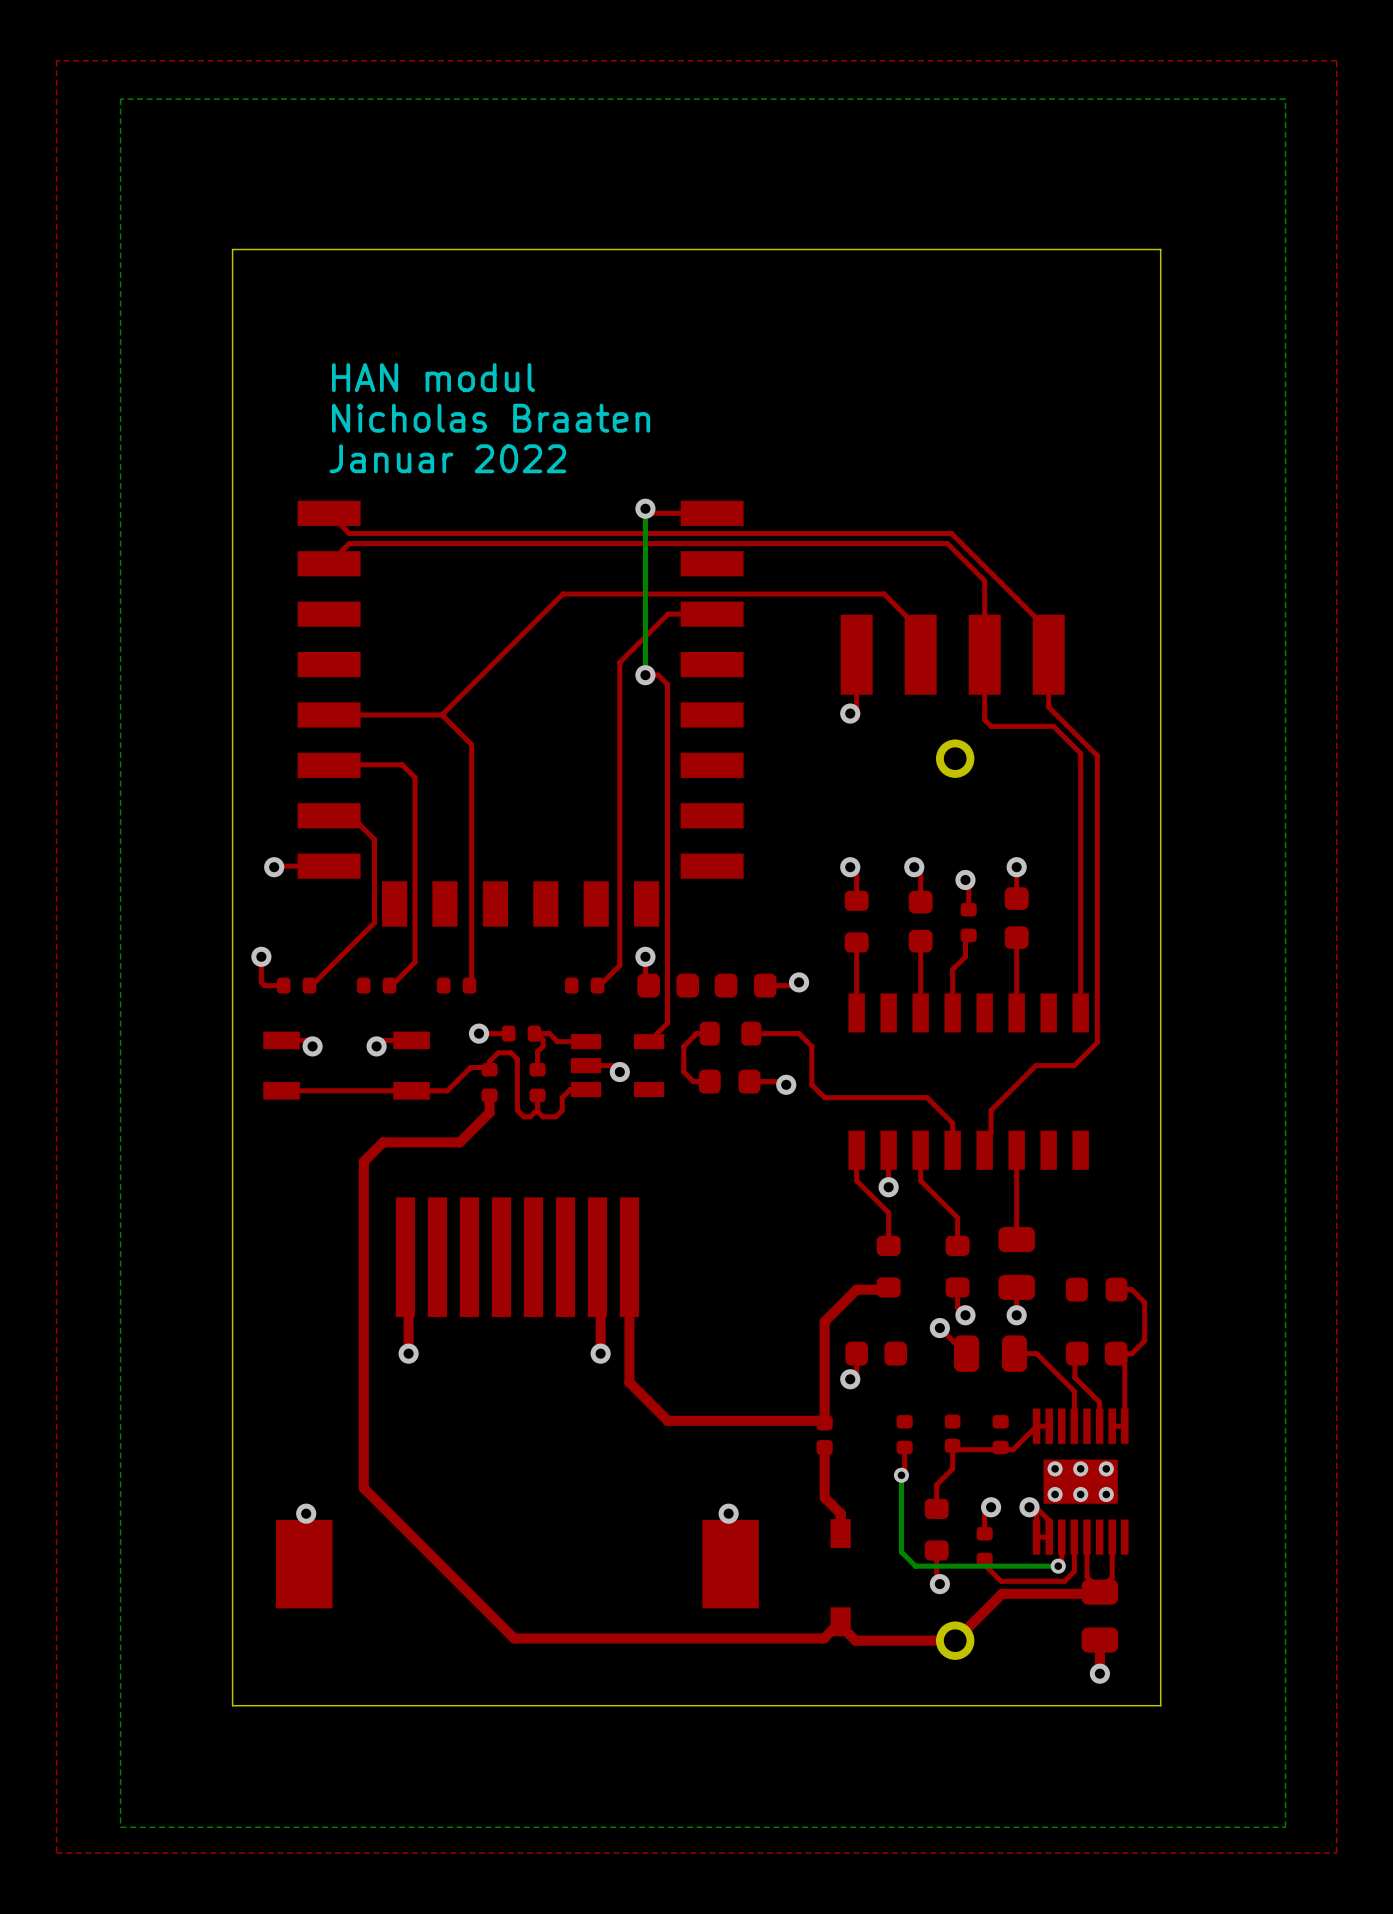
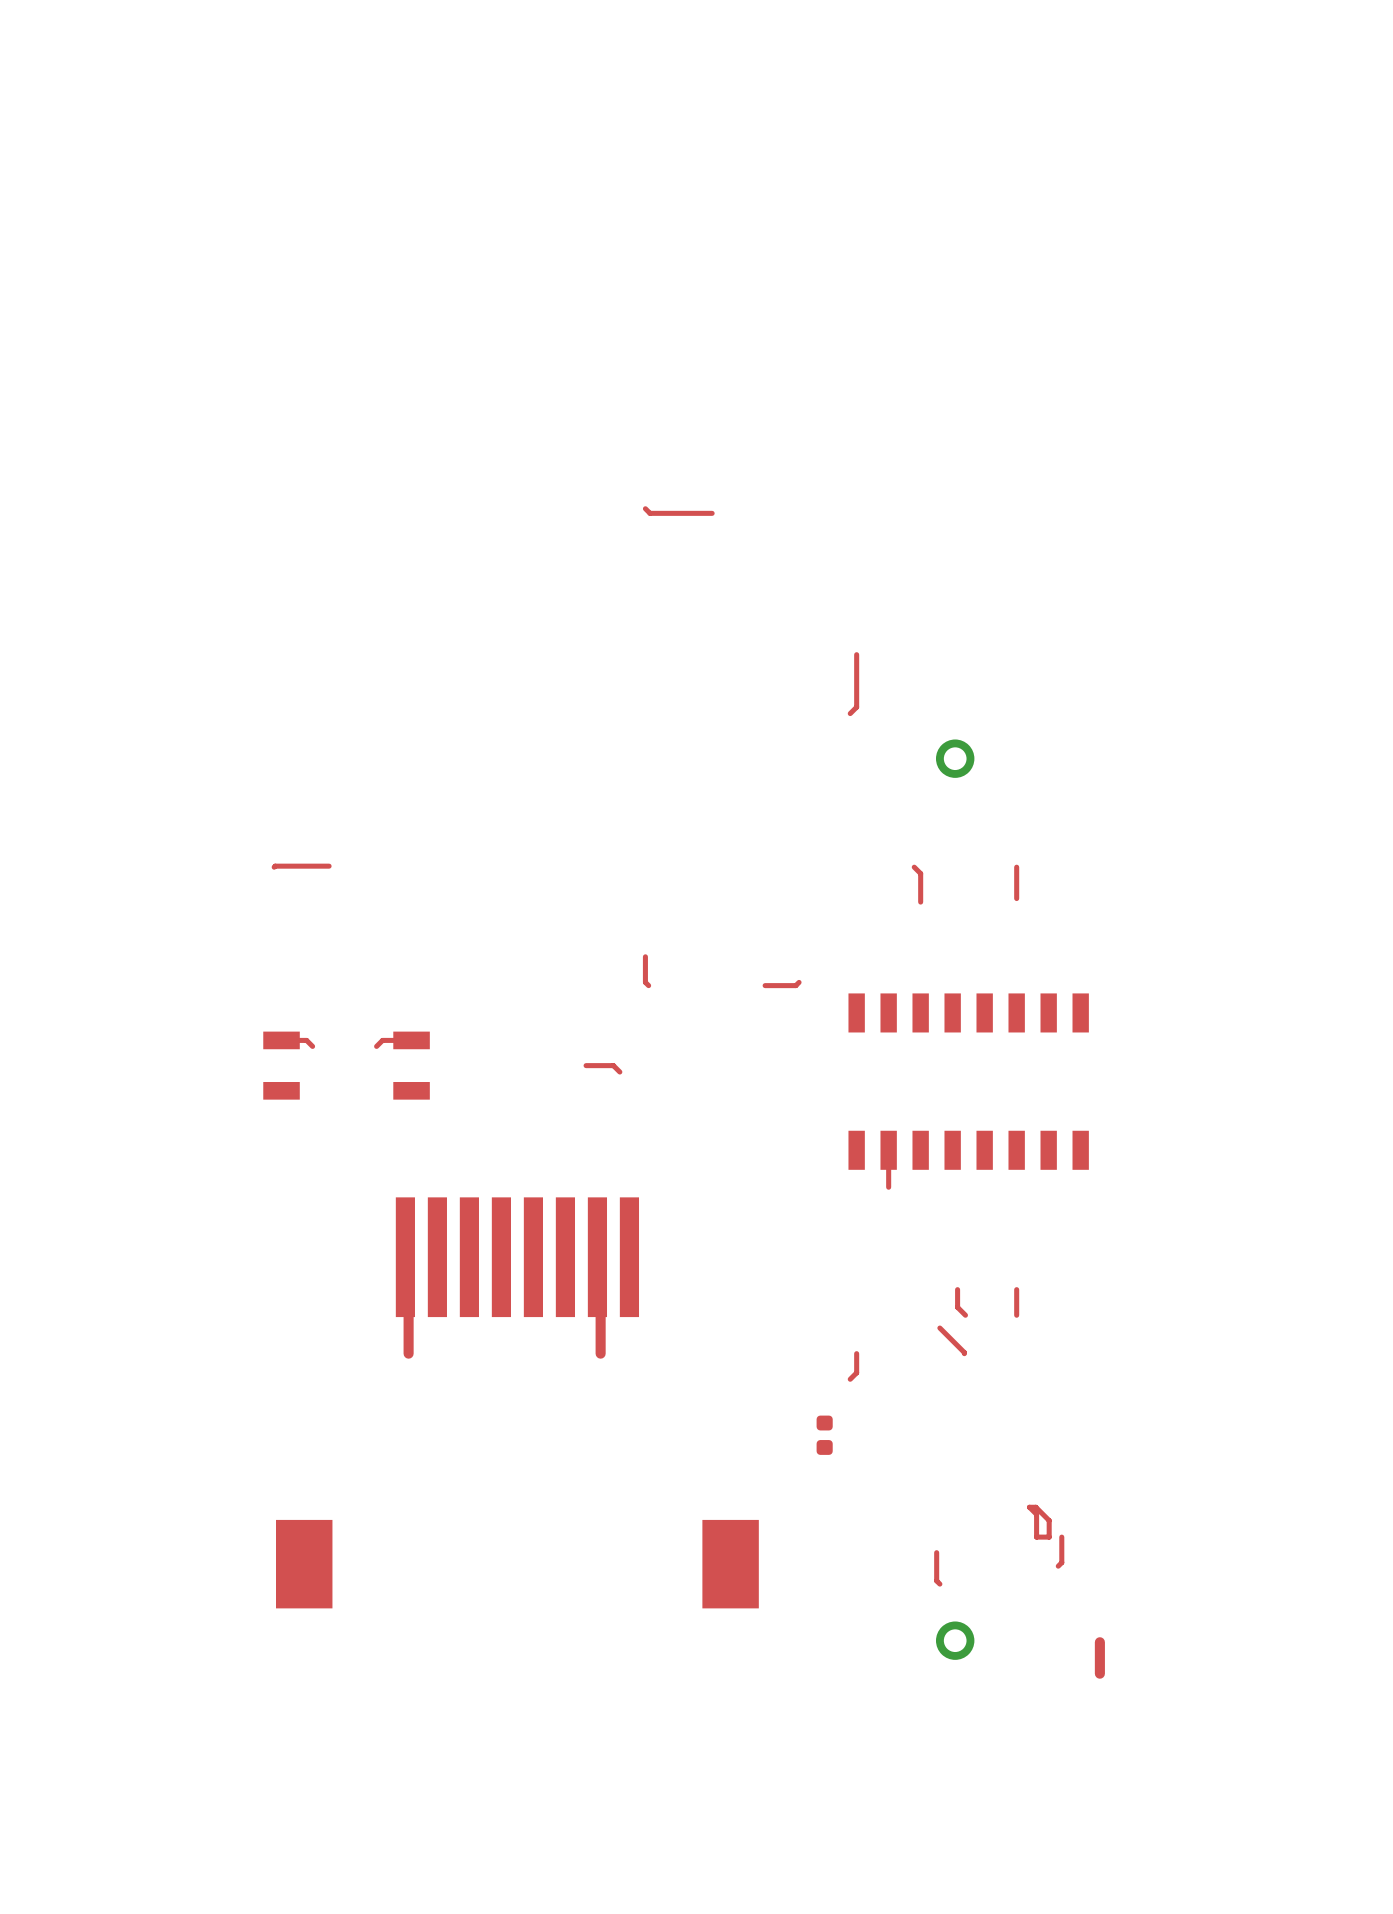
top zone outline: (1336, 60) (1336, 1852) (56, 1852) (56, 60) (1336, 60) -> none
bottom zone outline: (1285, 99) (1285, 1827) (120, 1827) (120, 99) (1285, 99) -> none
board edge: (1160, 249) (232, 249) (232, 1705) (1160, 1705) (1160, 249) -> none
text: HAN modul (433, 377) -> none
text: Nicholas Braaten (491, 418) -> none
text: Januar 2022 (447, 458) -> none
bottom track: (645, 508) (645, 675) -> none
via: (645, 508) -> none
top track: (329, 513) (349, 533) (951, 533) (1048, 630) (1048, 707) (1097, 755) (1097, 1042) (1074, 1065) (1035, 1065) (991, 1110) (991, 1132) (984, 1138) (984, 1150) -> none
top track: (329, 563) (349, 543) (947, 543) (984, 580) (984, 719) (991, 726) (1053, 726) (1080, 753) (1080, 1012) -> none
top track: (712, 614) (668, 614) (619, 662) (619, 965) (599, 985) -> none
top track: (920, 654) (920, 630) (884, 594) (562, 594) (441, 714) -> none
part: (952, 654) -> none
top track: (645, 675) (658, 675) (667, 684) (667, 1023) (649, 1041) -> none
via: (645, 675) -> none
part: (520, 713) -> none
via: (850, 713) -> none
top track: (441, 714) (329, 714) -> none
top track: (441, 714) (471, 744) (471, 985) -> none
top track: (329, 765) (402, 764) (415, 777) (415, 962) (391, 985) -> none
top track: (329, 815) (350, 815) (374, 839) (374, 922) (311, 985) -> none
via: (274, 867) -> none
top track: (850, 867) (856, 873) (856, 898) -> none
via: (850, 867) -> none
via: (914, 867) -> none
via: (1016, 867) -> none
top track: (965, 879) (968, 883) (968, 907) -> none
via: (965, 879) -> none
part: (1016, 918) -> none
part: (856, 921) -> none
part: (920, 921) -> none
part: (968, 922) -> none
top track: (968, 937) (965, 940) (965, 956) (952, 969) (952, 1012) -> none
top track: (1016, 937) (1016, 1012) -> none
top track: (920, 941) (920, 1012) -> none
top track: (856, 944) (856, 1012) -> none
top track: (261, 956) (261, 982) (264, 985) (281, 985) -> none
via: (261, 956) -> none
via: (645, 956) -> none
via: (799, 982) -> none
part: (296, 985) -> none
part: (376, 985) -> none
part: (456, 985) -> none
part: (584, 985) -> none
part: (668, 985) -> none
part: (745, 985) -> none
via: (479, 1033) -> none
top track: (506, 1033) (479, 1033) -> none
part: (521, 1033) -> none
top track: (707, 1033) (696, 1033) (683, 1046) (683, 1072) (693, 1081) (707, 1081) -> none
part: (730, 1033) -> none
top track: (753, 1033) (799, 1033) (811, 1046) (811, 1084) (824, 1097) (927, 1097) (952, 1123) (952, 1150) -> none
top track: (586, 1041) (557, 1041) (549, 1033) (536, 1033) (543, 1040) (543, 1046) (537, 1051) (537, 1067) -> none
via: (312, 1046) -> none
via: (376, 1046) -> none
part: (617, 1065) -> none
via: (619, 1072) -> none
part: (729, 1081) -> none
top track: (751, 1081) (783, 1081) (786, 1084) -> none
part: (489, 1082) -> none
part: (537, 1082) -> none
via: (786, 1084) -> none
top track: (586, 1089) (570, 1089) (562, 1097) (562, 1110) (555, 1116) (543, 1116) (537, 1111) (537, 1097) -> none
top track: (281, 1090) (447, 1090) (470, 1067) (489, 1067) (489, 1061) (498, 1052) (511, 1052) (517, 1059) (517, 1110) (523, 1116) (530, 1116) (537, 1109) -> none
top track: (489, 1097) (489, 1112) (459, 1142) (383, 1142) (363, 1161) (363, 1488) (514, 1638) (823, 1638) (840, 1621) (840, 1625) (855, 1640) (955, 1640) (1002, 1593) (1095, 1593) (1099, 1589) -> none
top track: (856, 1150) (856, 1180) (888, 1212) (888, 1243) -> none
top track: (920, 1150) (920, 1180) (957, 1217) (957, 1243) -> none
top track: (1016, 1150) (1016, 1237) -> none
via: (888, 1187) -> none
top track: (629, 1257) (629, 1382) (667, 1420) (824, 1420) (824, 1321) (856, 1289) (888, 1289) -> none
part: (1016, 1263) -> none
part: (888, 1266) -> none
part: (957, 1266) -> none
part: (1096, 1289) -> none
top track: (1116, 1289) (1131, 1289) (1144, 1302) (1144, 1340) (1131, 1353) (1118, 1353) (1124, 1360) (1124, 1426) (1112, 1426) -> none
via: (965, 1315) -> none
via: (1016, 1315) -> none
via: (939, 1328) -> none
via: (408, 1353) -> none
via: (600, 1353) -> none
part: (876, 1353) -> none
part: (990, 1353) -> none
top track: (1016, 1353) (1036, 1353) (1074, 1391) (1074, 1426) -> none
top track: (1074, 1353) (1074, 1377) (1099, 1402) (1099, 1426) -> none
part: (1096, 1353) -> none
via: (850, 1379) -> none
top track: (1049, 1426) (1036, 1426) (1013, 1449) (954, 1449) (952, 1447) (952, 1468) (936, 1484) (936, 1506) -> none
part: (952, 1433) -> none
part: (904, 1434) -> none
part: (1000, 1434) -> none
top track: (824, 1449) (824, 1497) (840, 1513) (840, 1533) -> none
top track: (904, 1449) (904, 1472) (901, 1475) -> none
via: (1055, 1468) -> none
via: (1080, 1468) -> none
via: (1106, 1468) -> none
bottom track: (901, 1475) (901, 1552) (915, 1566) (1058, 1566) -> none
via: (901, 1475) -> none
part: (1080, 1481) -> none
via: (1055, 1494) -> none
via: (1080, 1494) -> none
via: (1106, 1494) -> none
top track: (991, 1507) (984, 1513) (984, 1531) -> none
via: (991, 1507) -> none
via: (1029, 1507) -> none
via: (306, 1513) -> none
via: (728, 1513) -> none
part: (936, 1529) -> none
top track: (1074, 1537) (1074, 1571) (1064, 1581) (1001, 1581) (984, 1564) (984, 1561) -> none
top track: (1086, 1537) (1086, 1577) (1099, 1589) -> none
top track: (1112, 1537) (1112, 1577) (1099, 1589) -> none
part: (984, 1546) -> none
via: (1058, 1566) -> none
part: (840, 1577) -> none
via: (939, 1584) -> none
part: (1099, 1616) -> none
via: (1099, 1673) -> none

